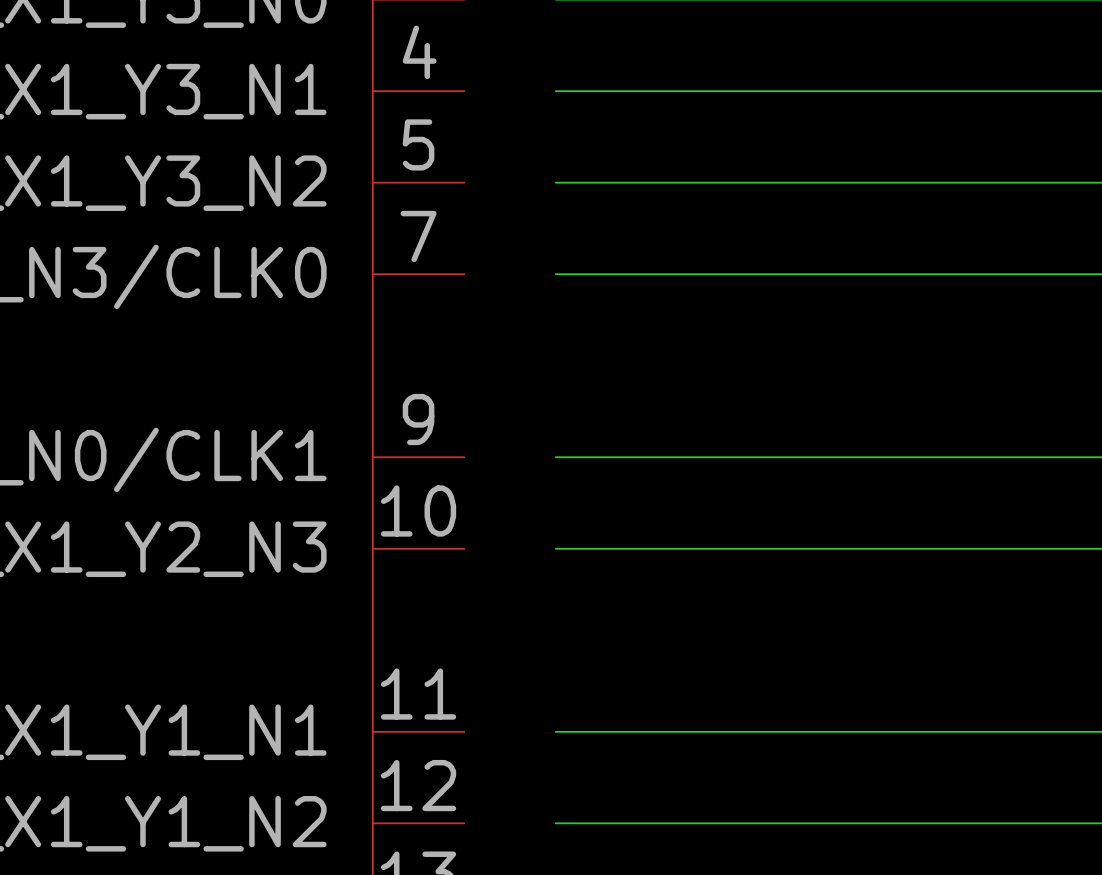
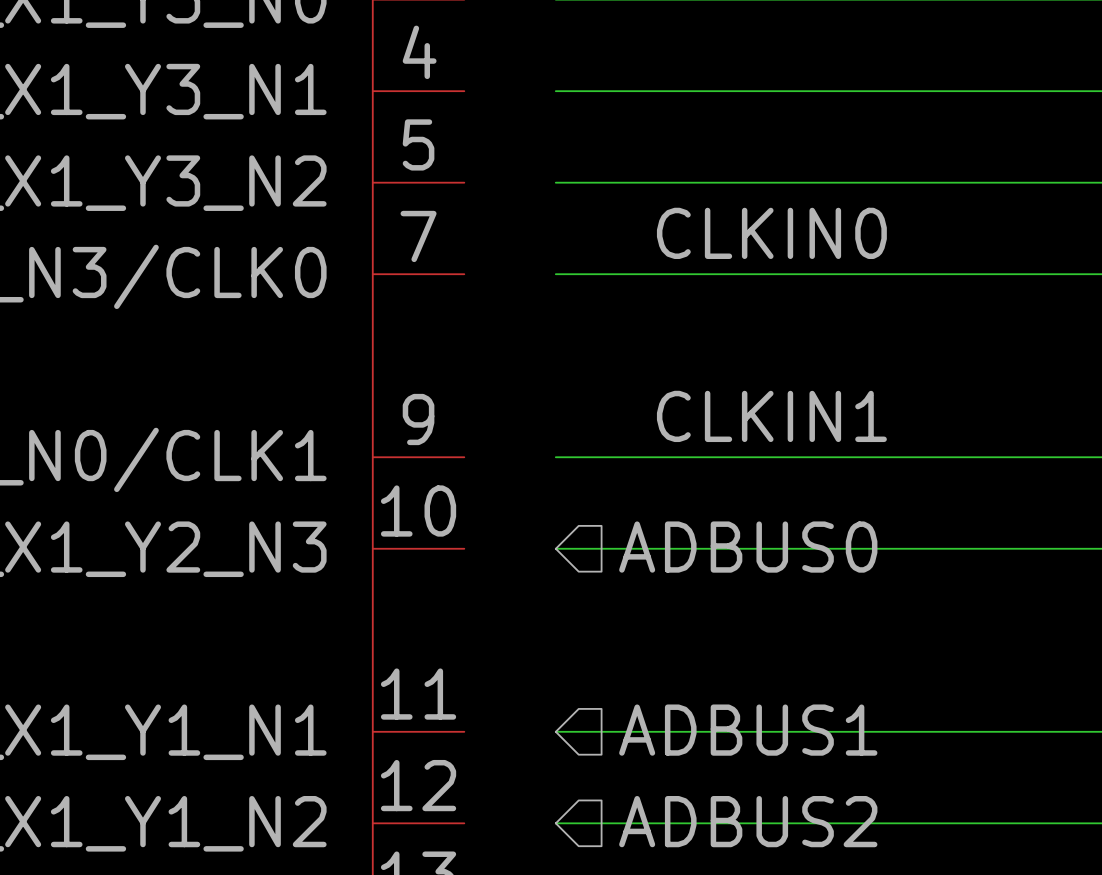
label: none -> CLKIN0 (771, 233)
label: none -> CLKIN1 (771, 416)
hierarchical label: none -> ADBUS0 (748, 547)
hierarchical label: none -> ADBUS1 (748, 730)
hierarchical label: none -> ADBUS2 (748, 821)

